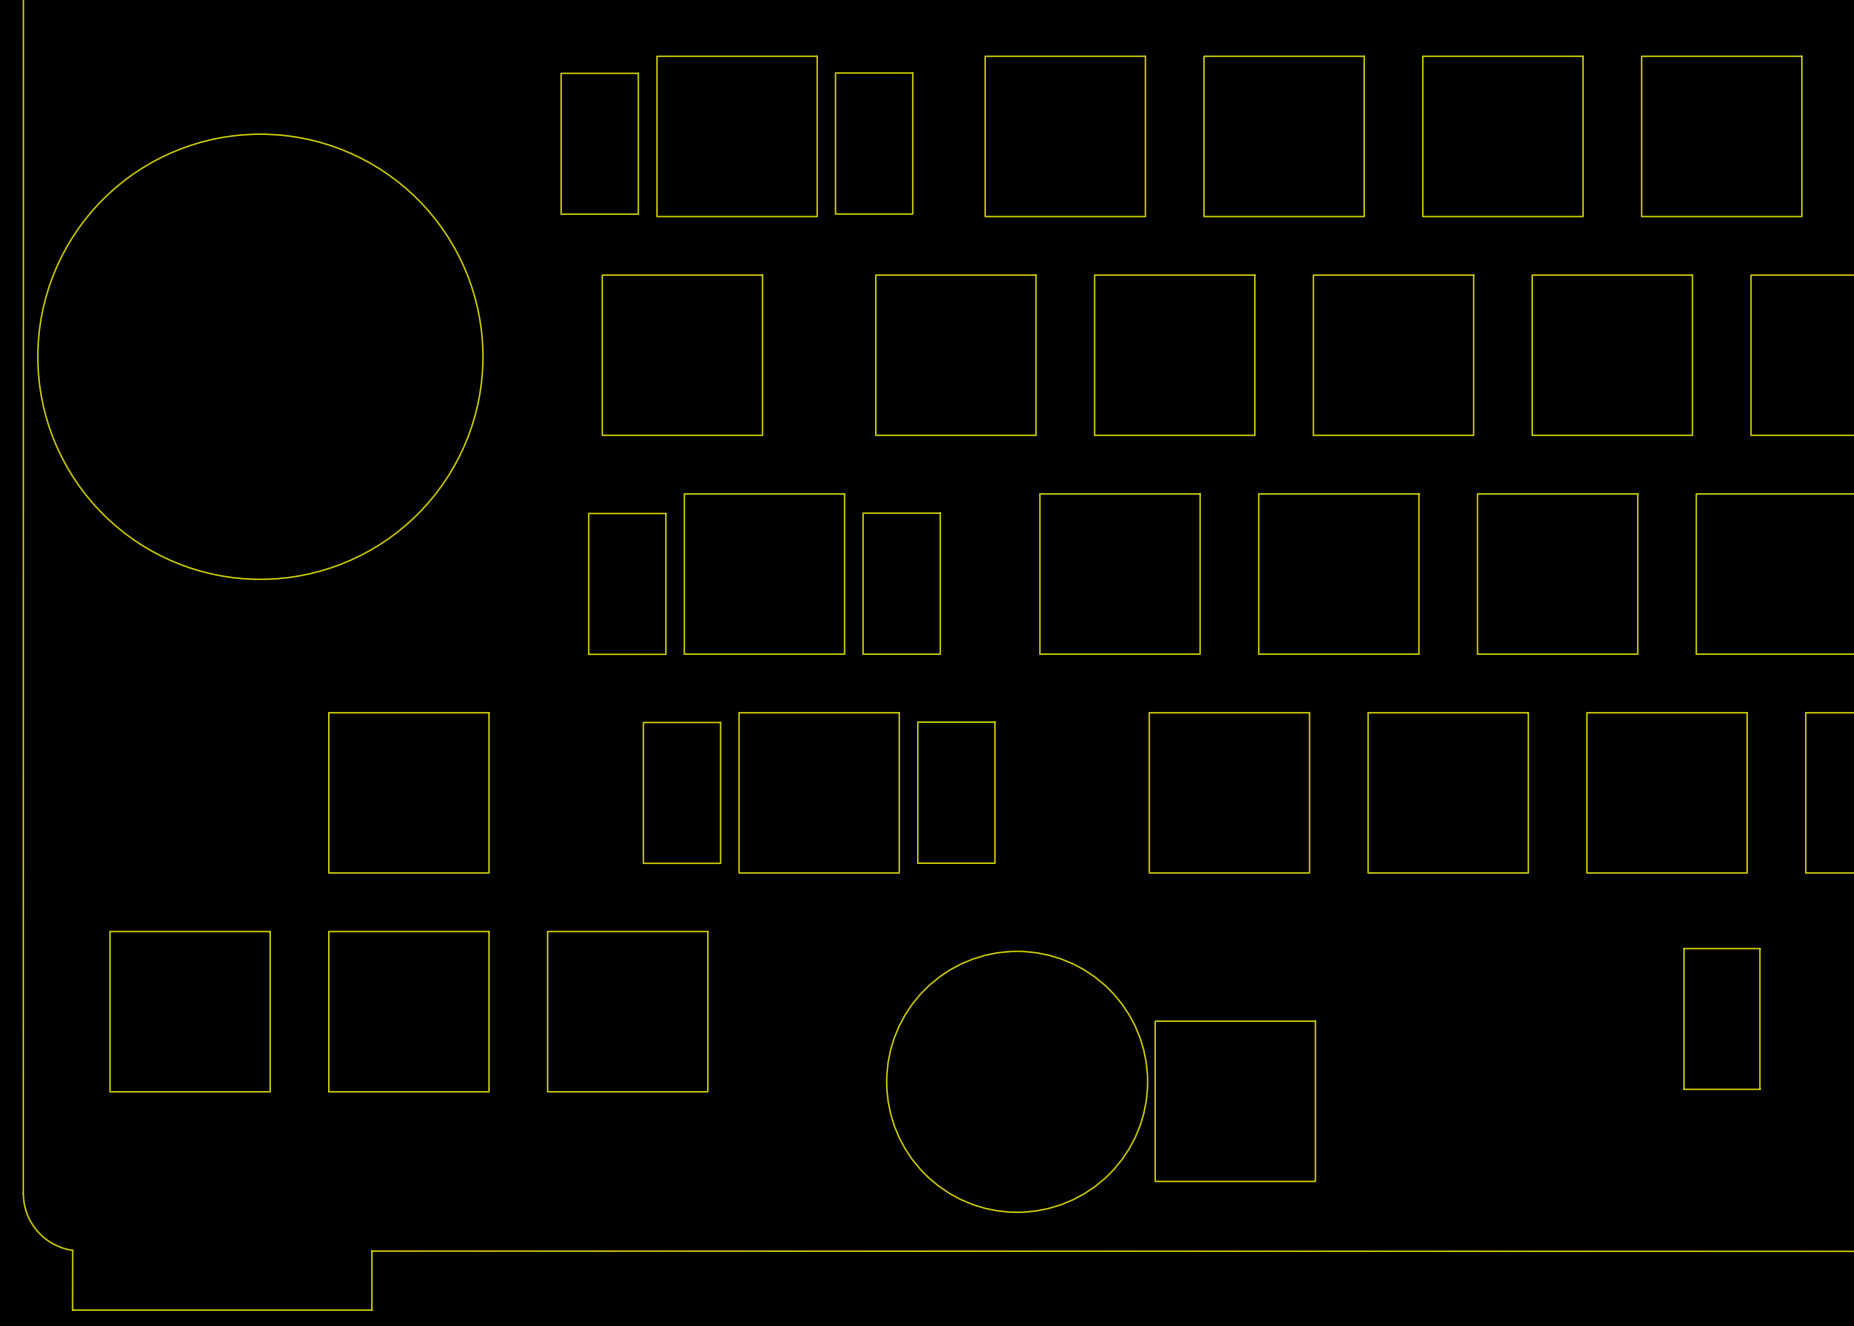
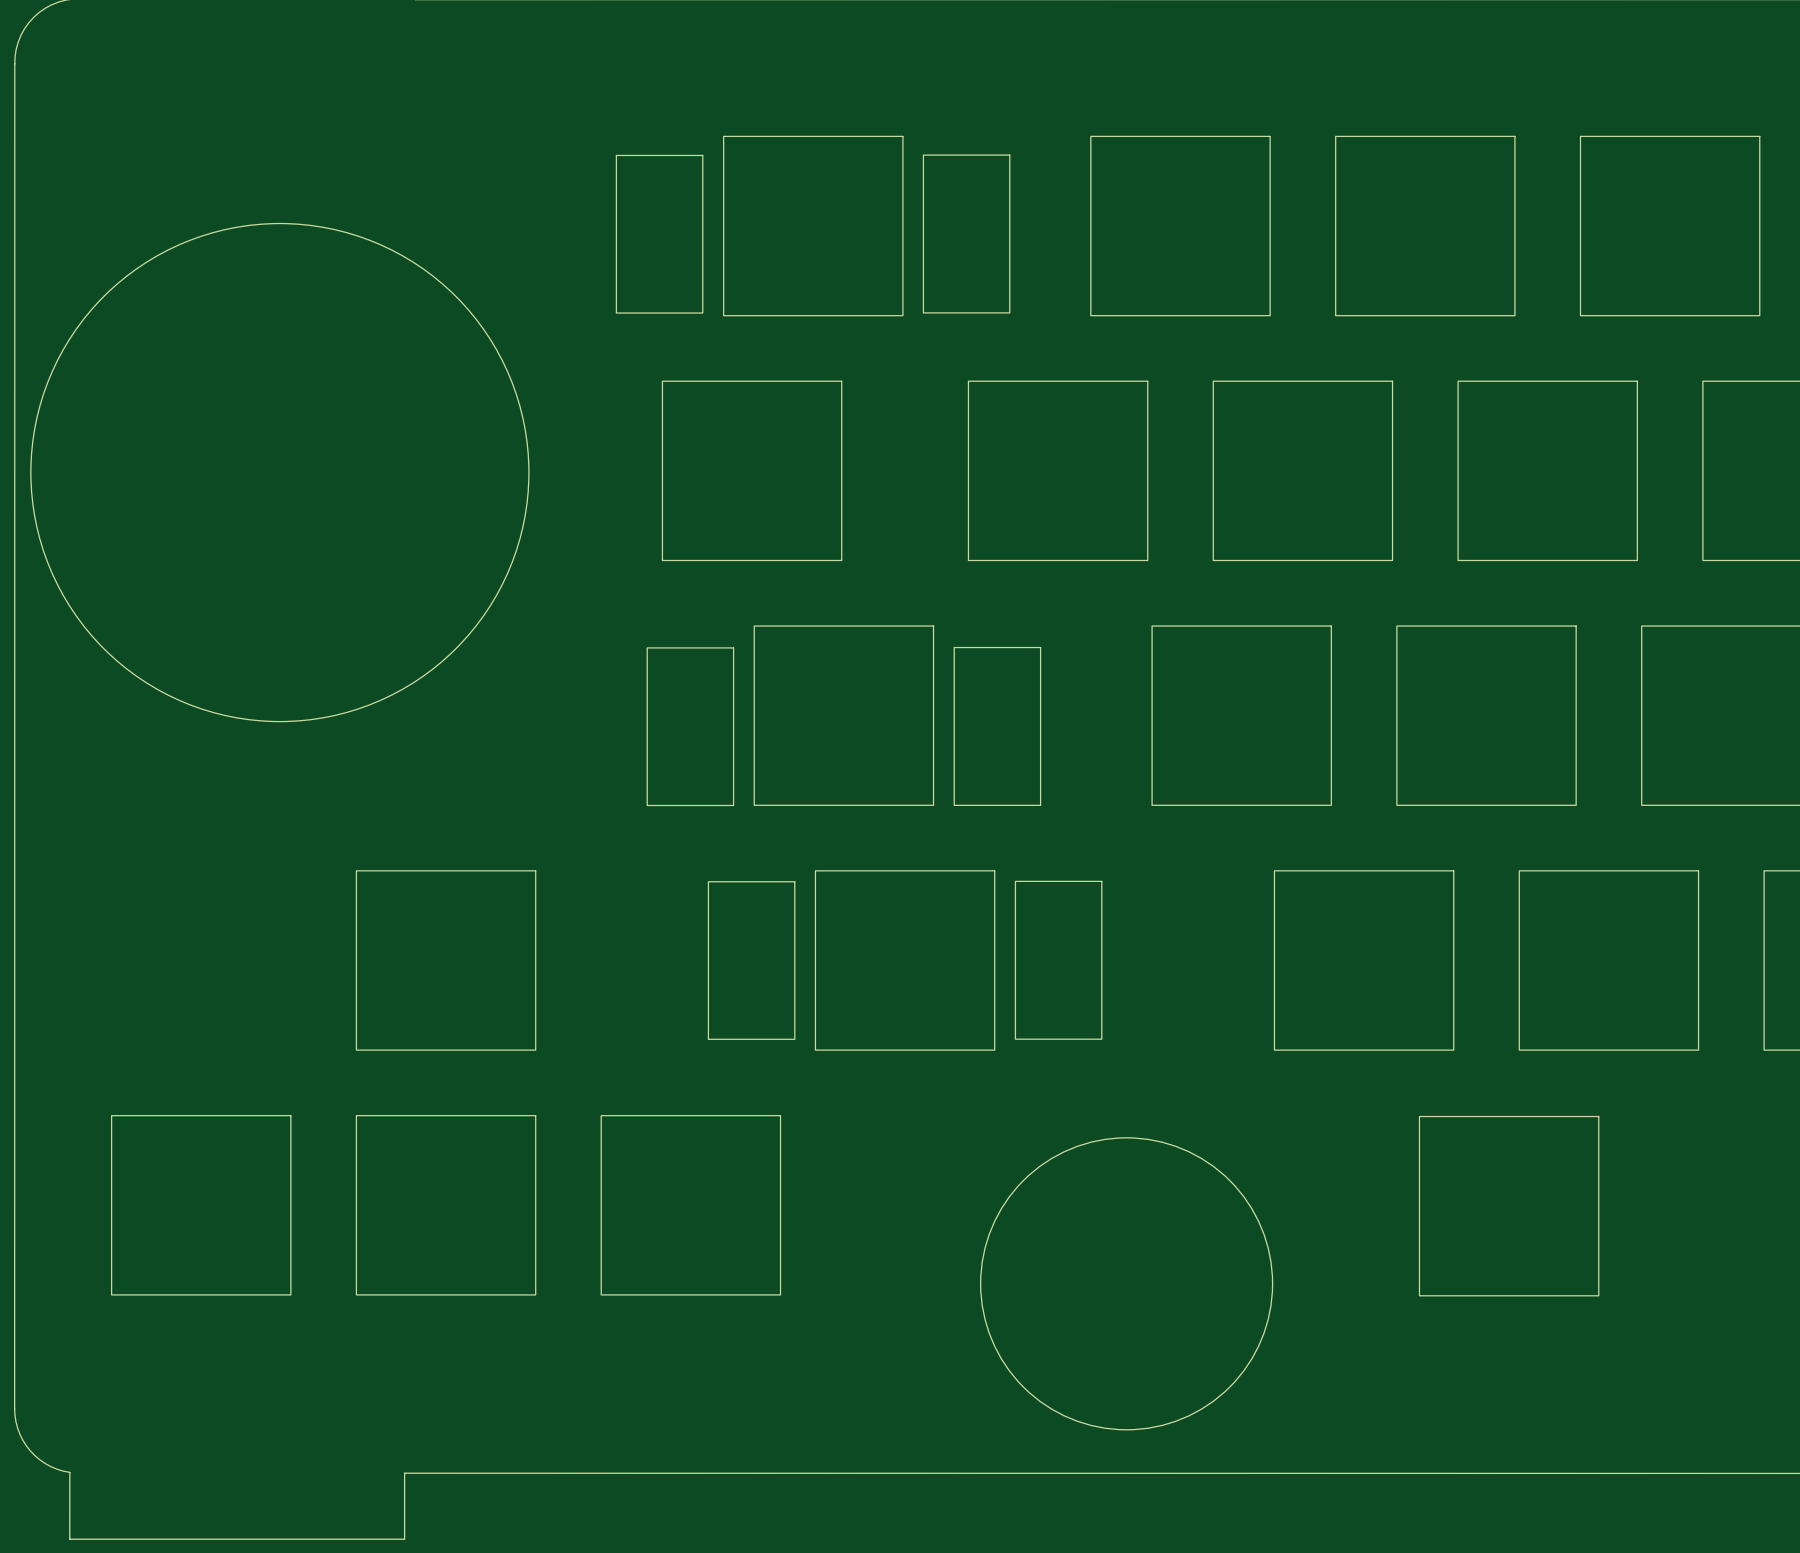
drawing position: (1235, 1101) -> (1509, 1206)

